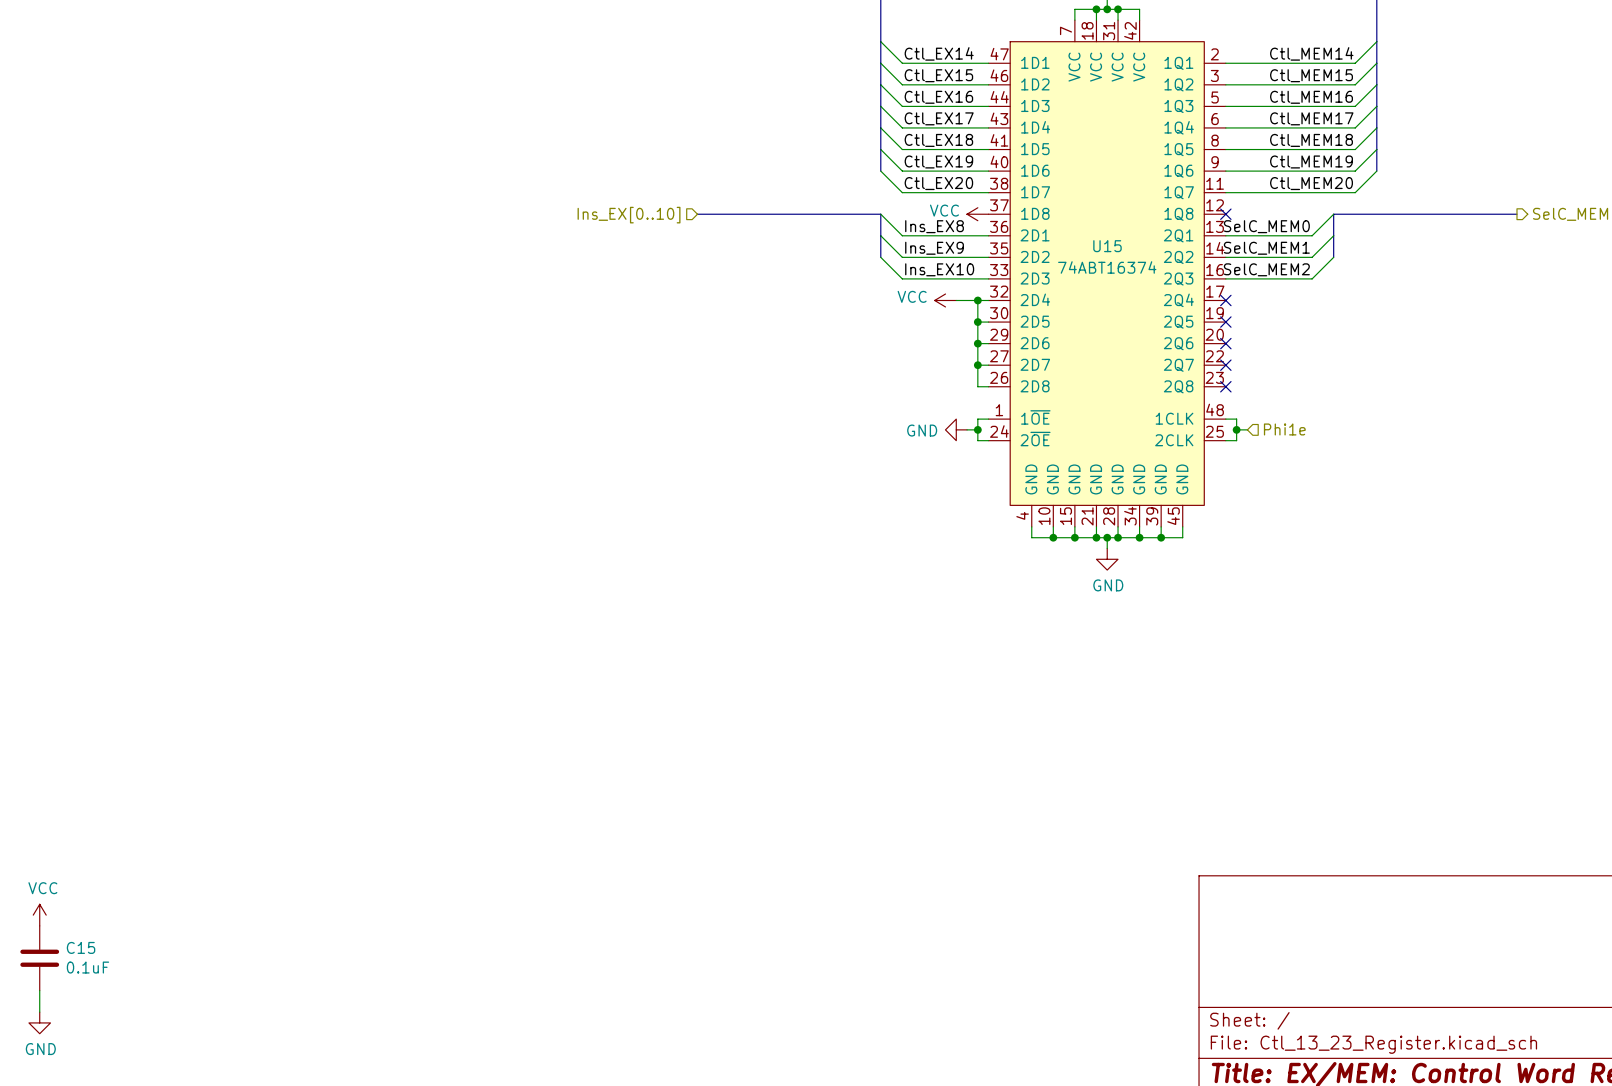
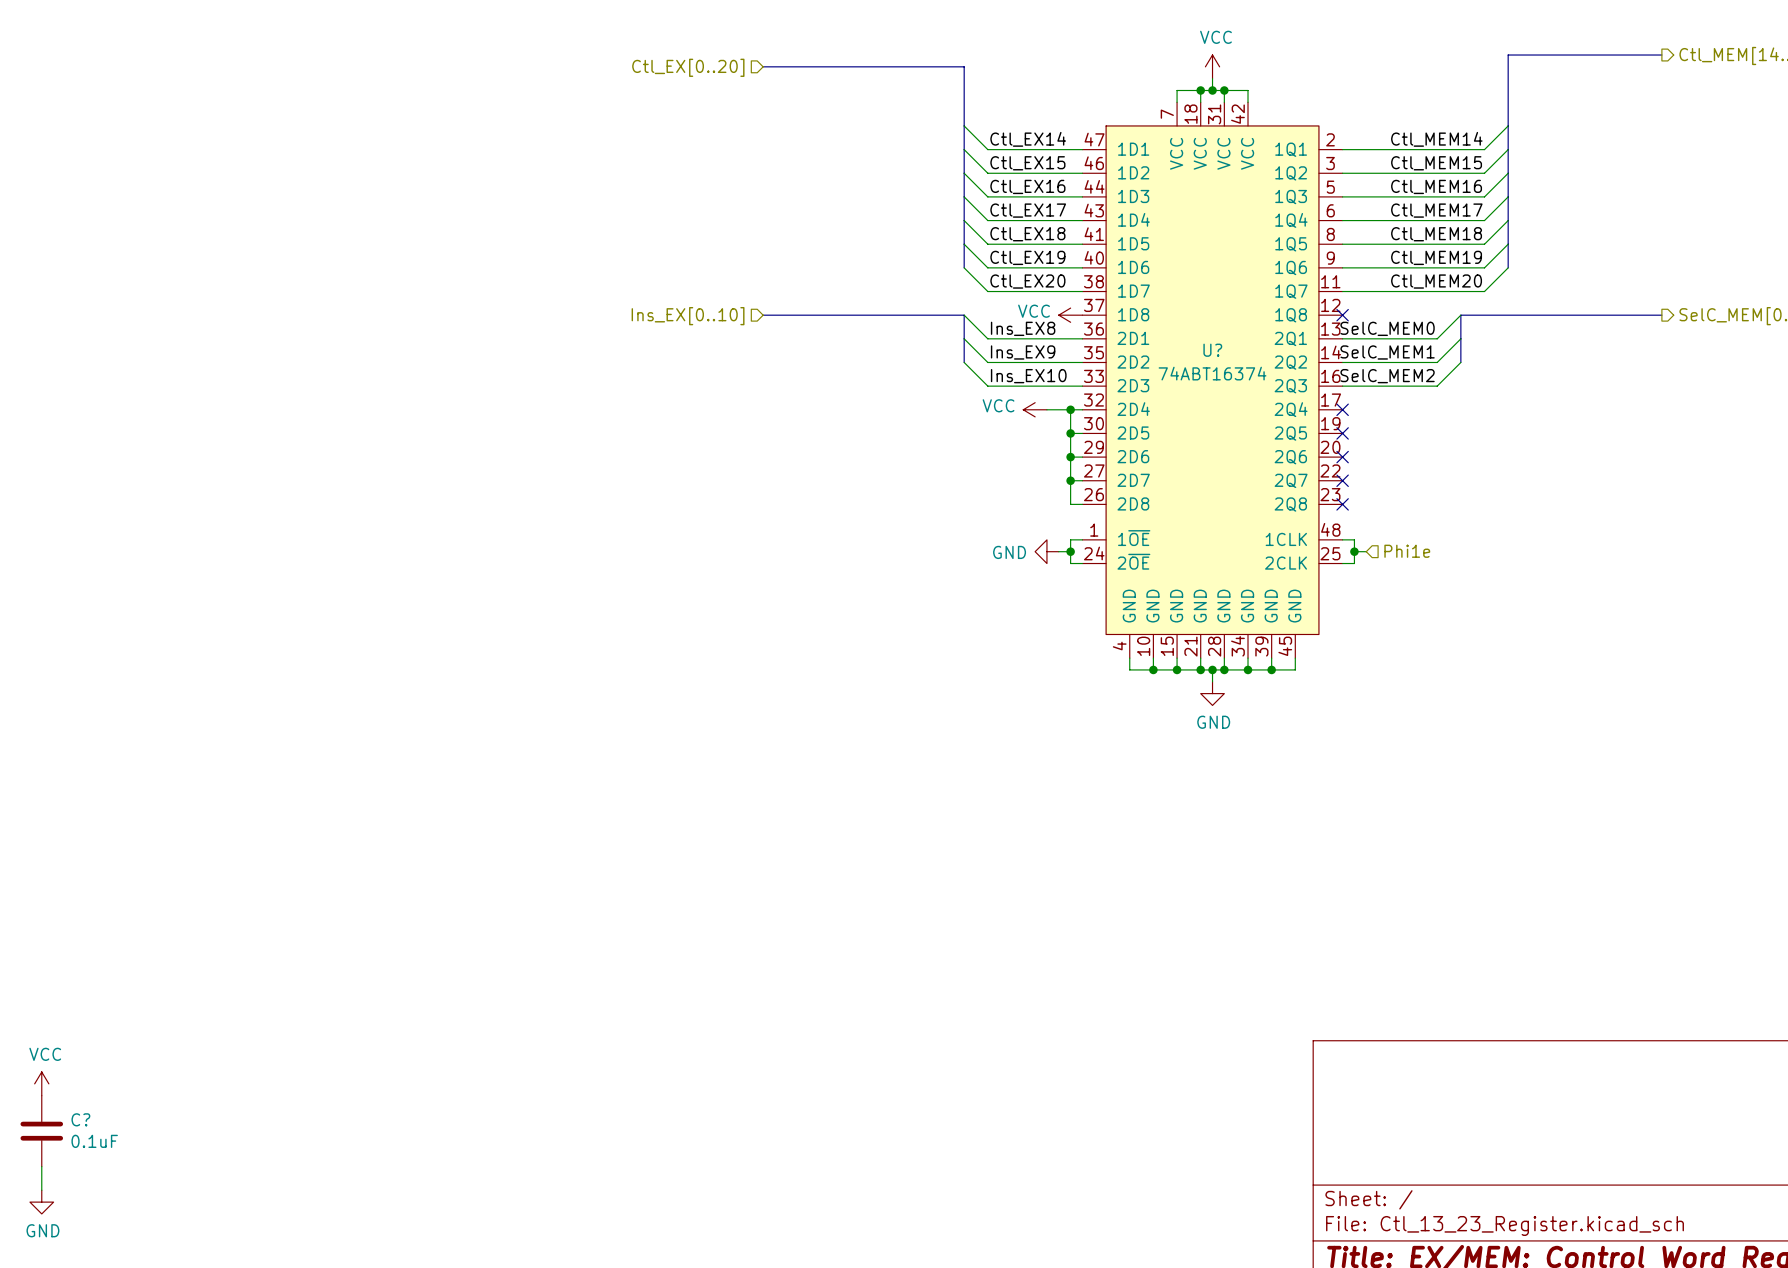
U15 name: U15 (1107, 246) -> U? (1212, 350)
C15 name: C15 (81, 947) -> C? (80, 1119)

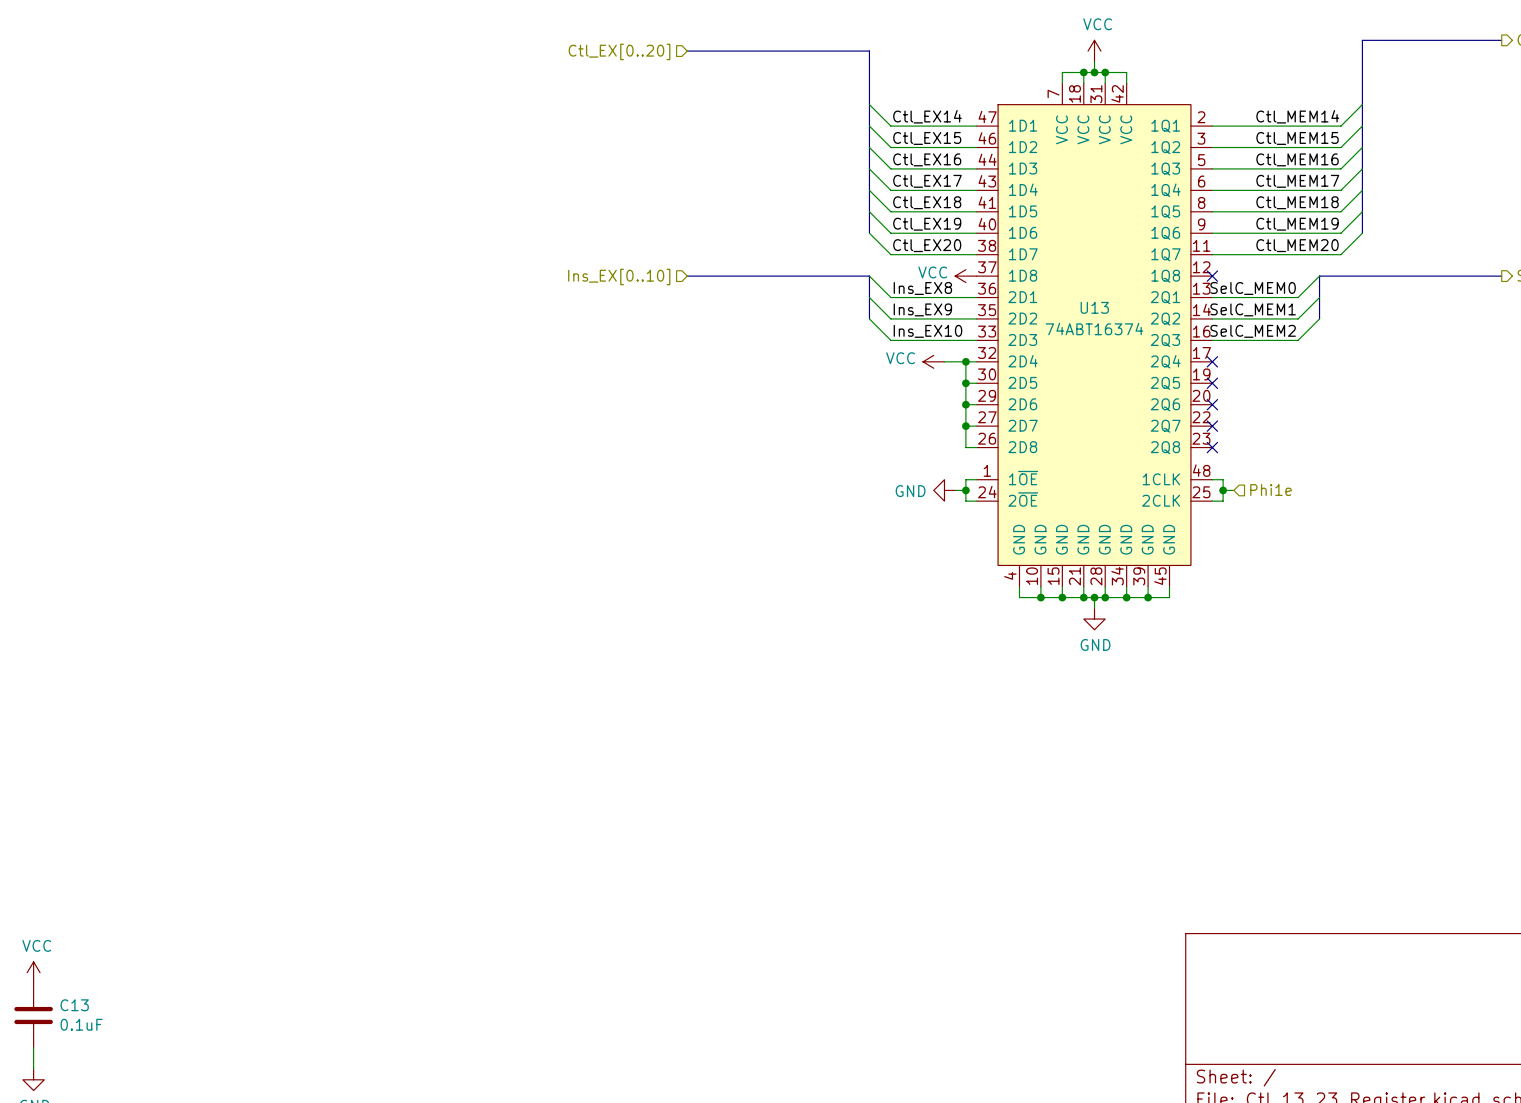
U? name: U? (1212, 350) -> U13 (1094, 307)
C? name: C? (80, 1119) -> C13 (74, 1005)

